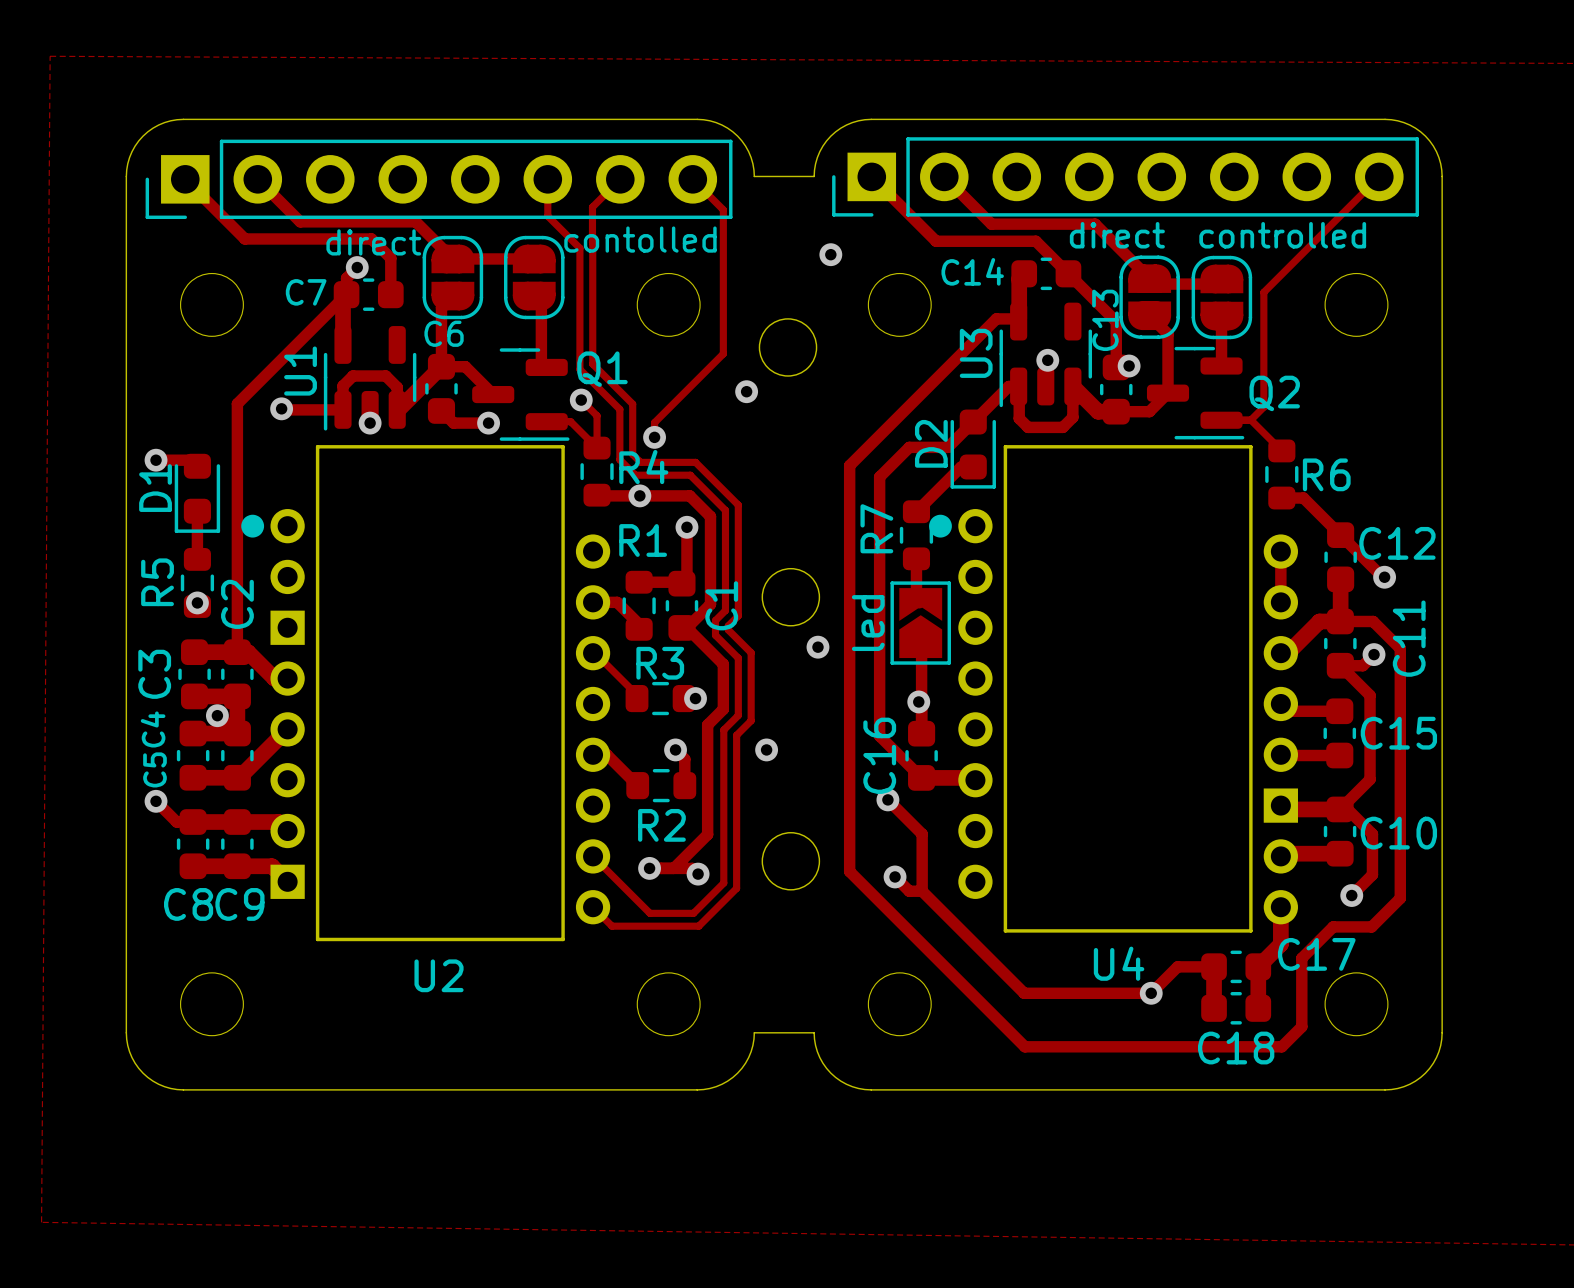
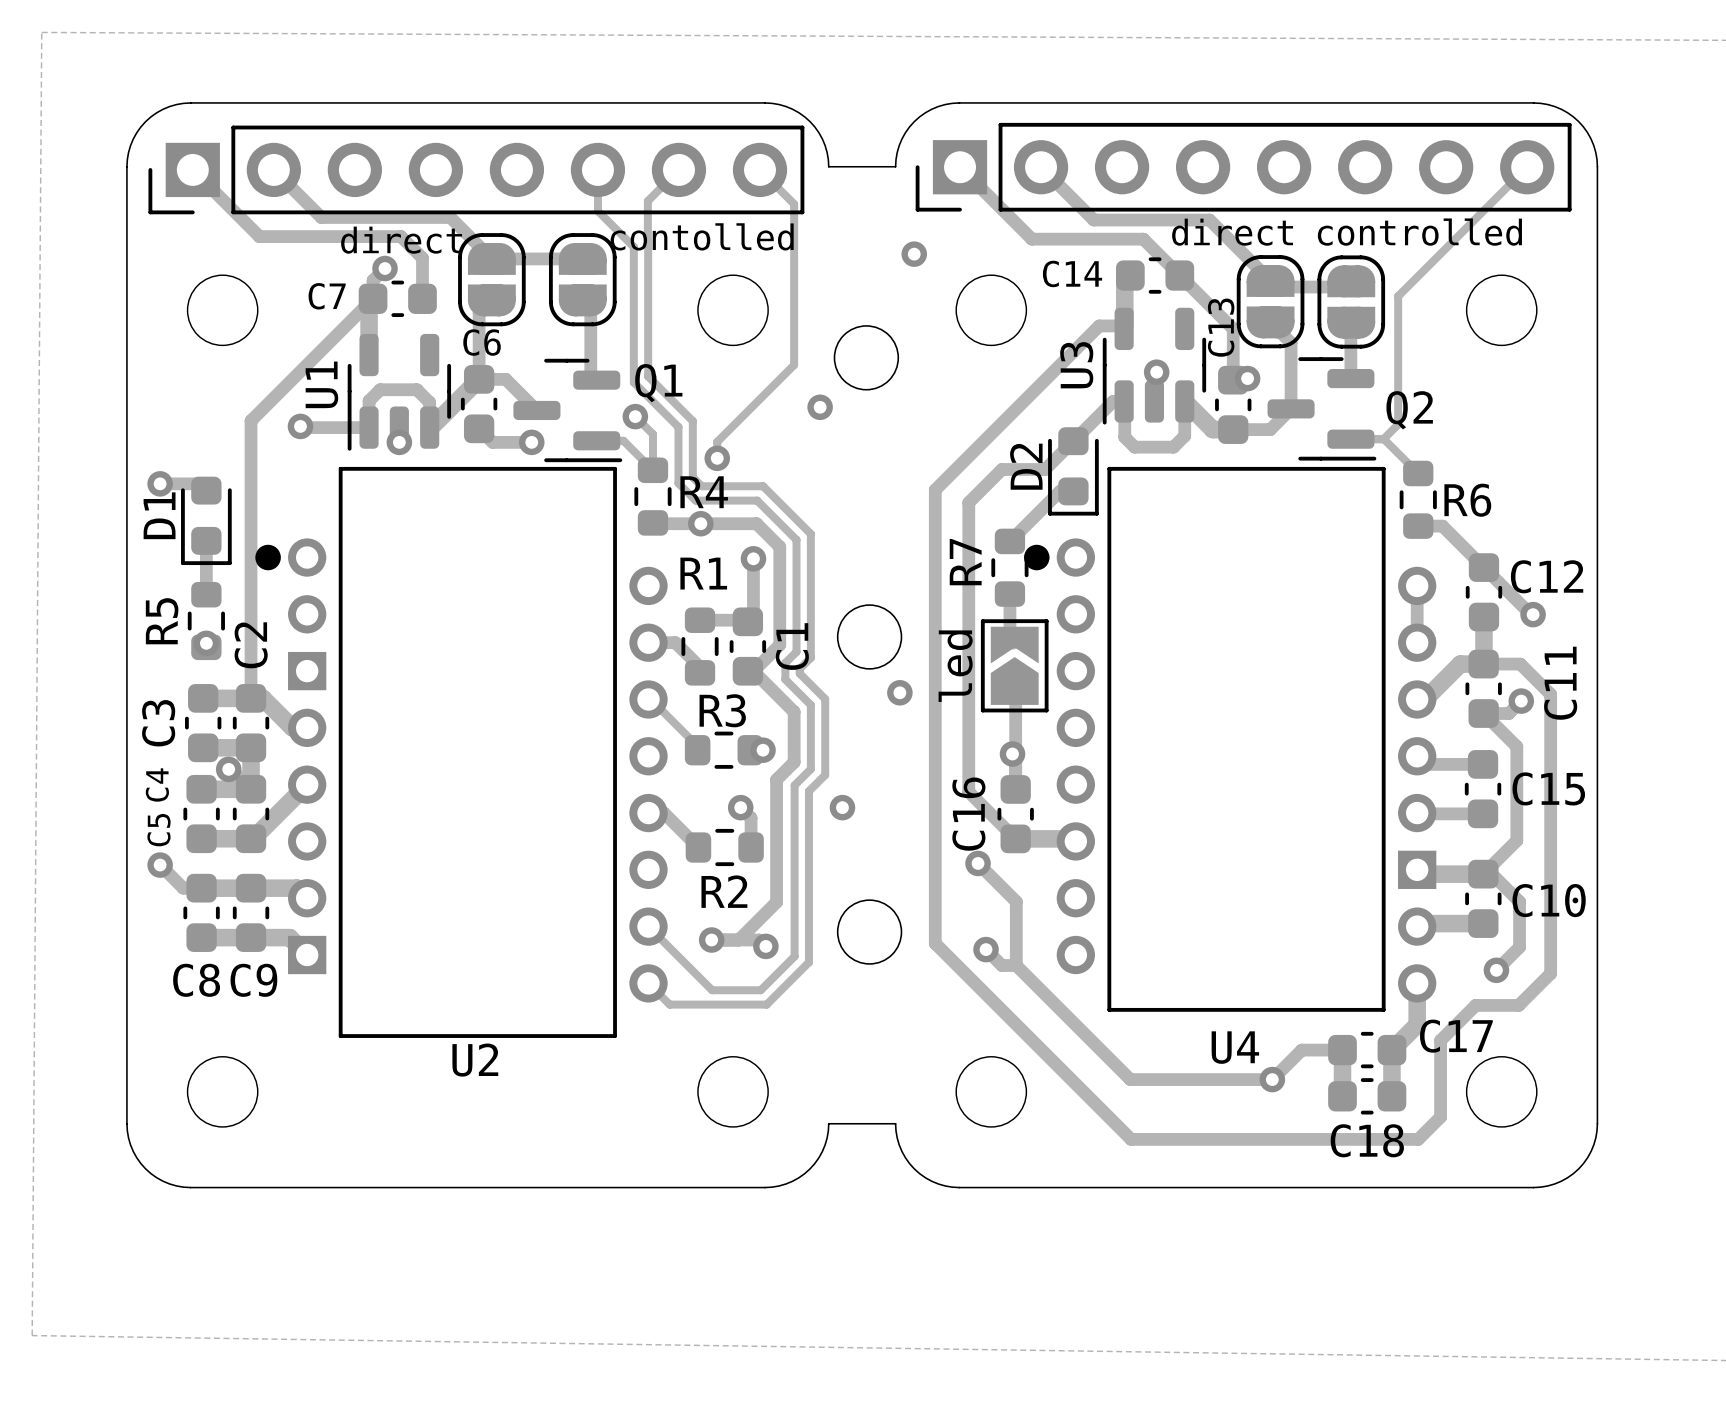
U2 footprint: [241, 445, 611, 942] -> [255, 466, 668, 1038]

